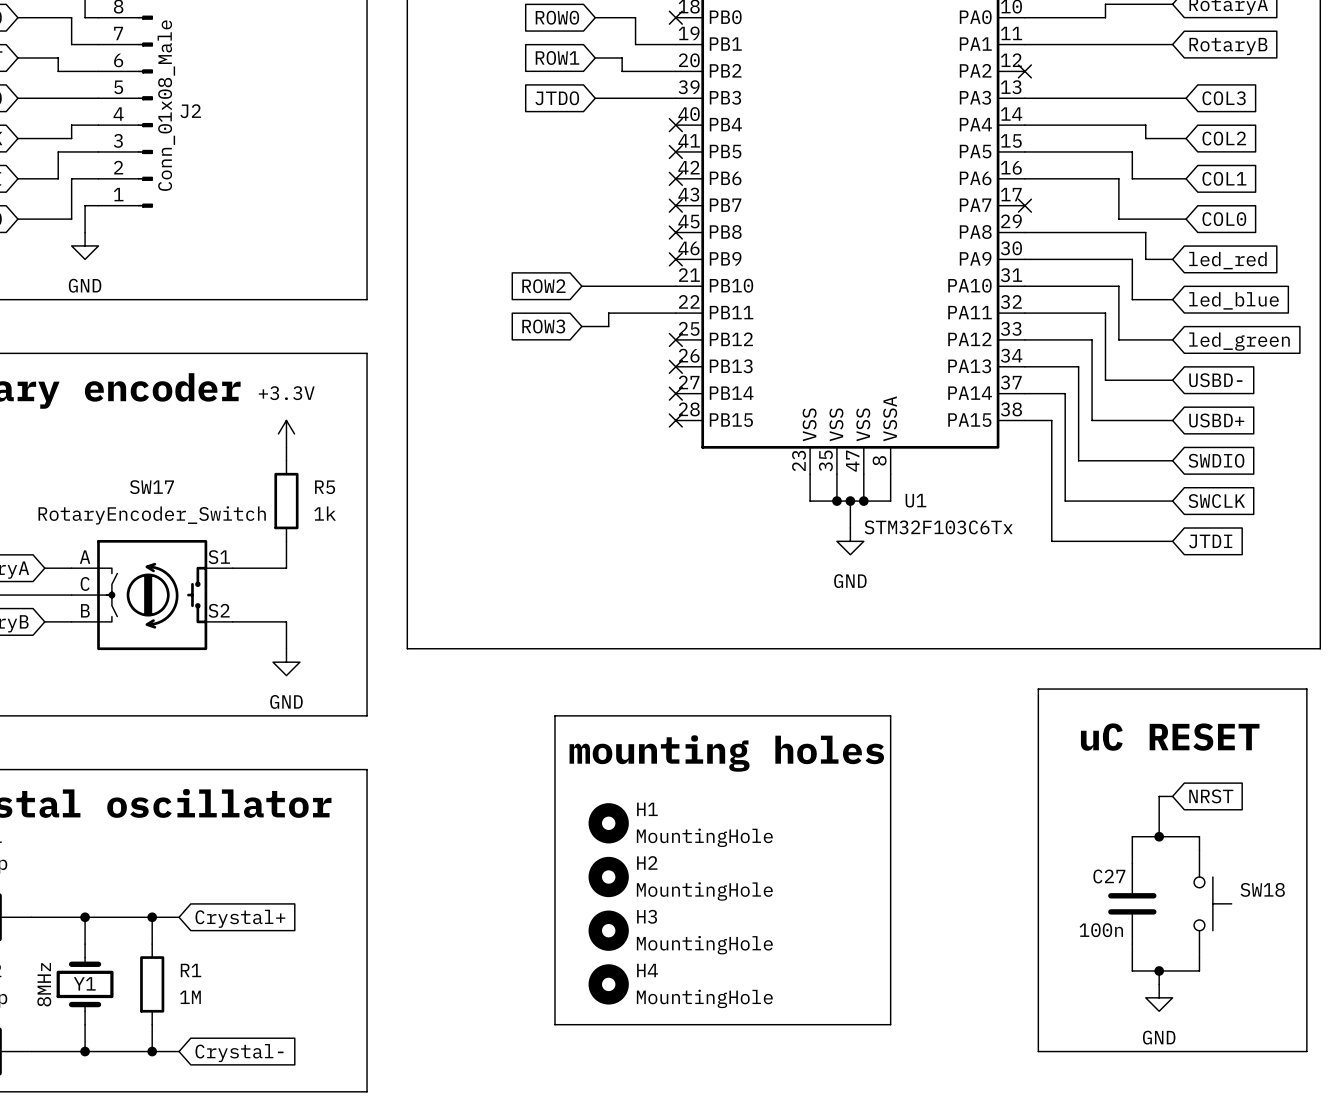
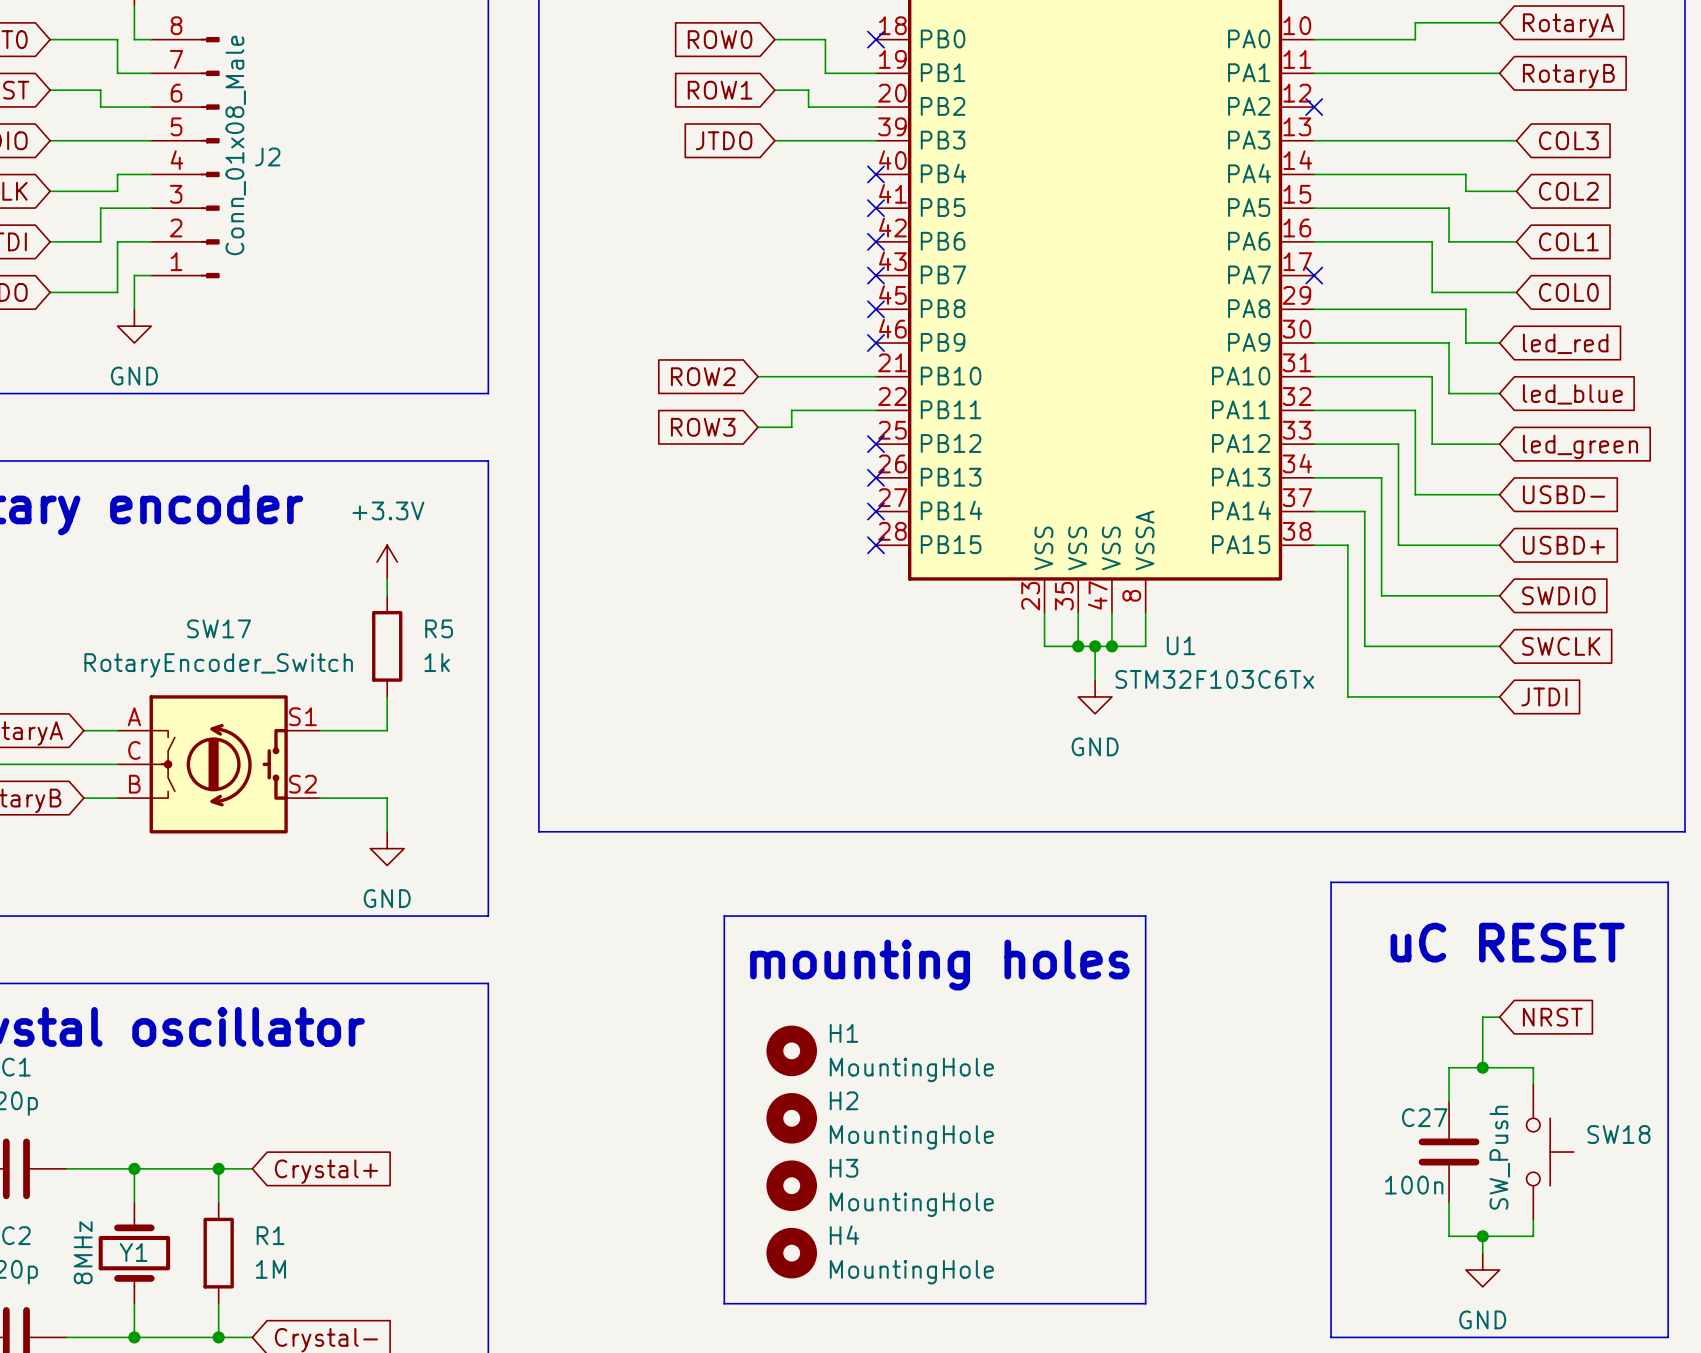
SW18 value: none -> SW_Push (1499, 1157)

